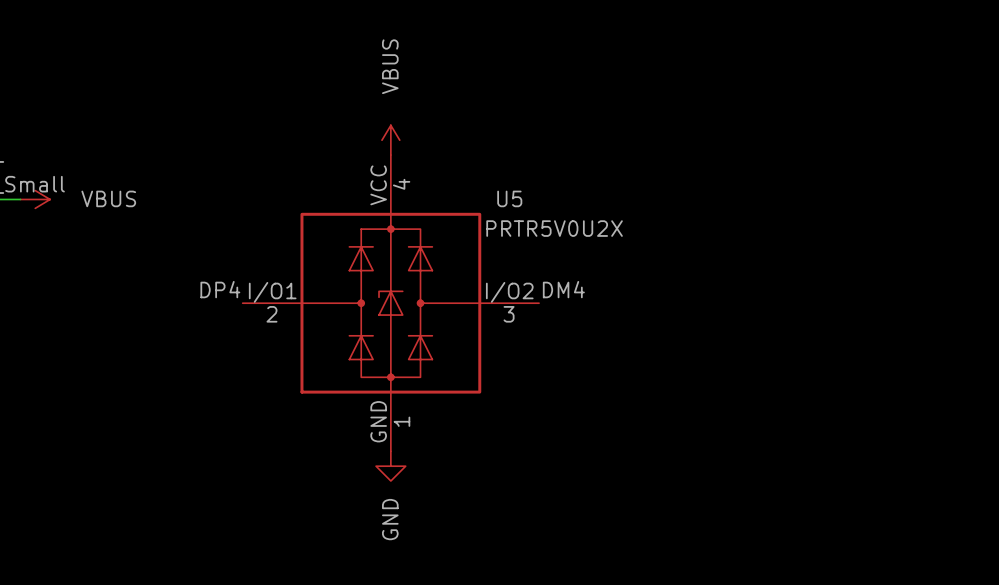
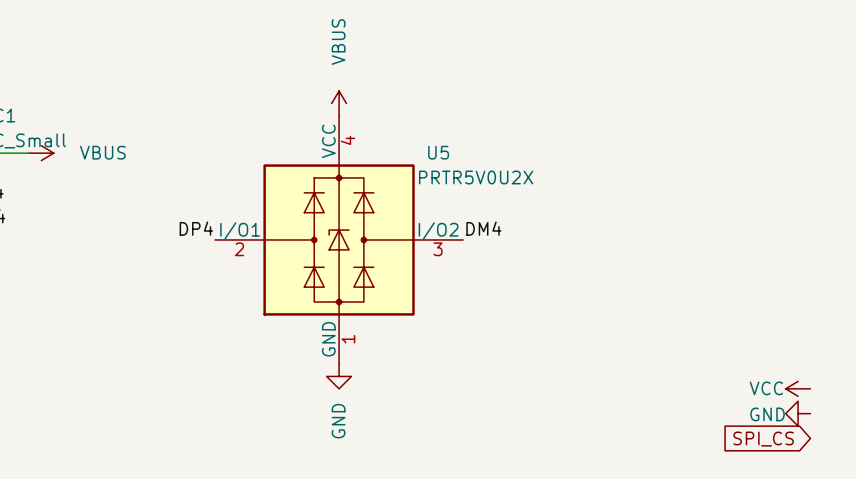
power symbol: none -> VCC (798, 388)
power symbol: none -> GND (798, 413)
global label: none -> SPI_CS (763, 439)

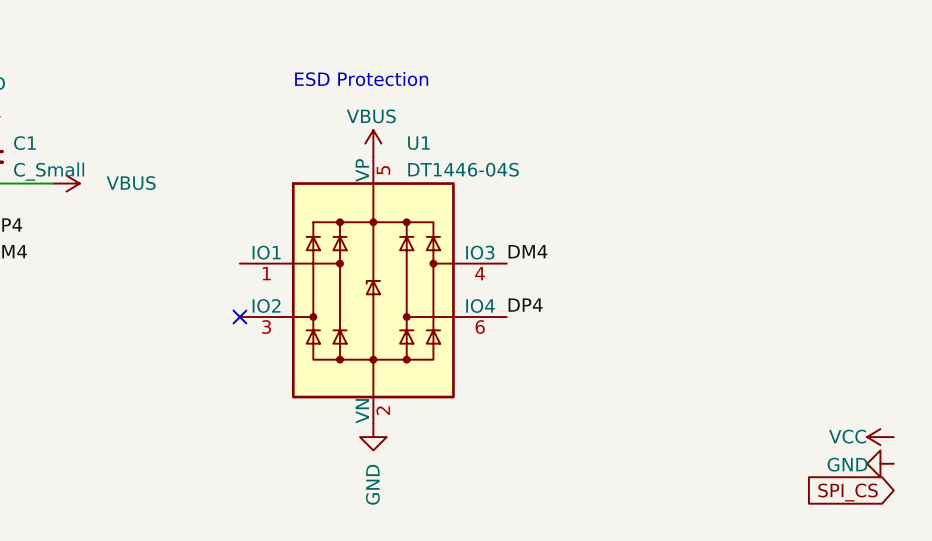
power symbol text rotation: 0° (338, 42) -> 90° clockwise (371, 116)
text: none -> ESD Protection (361, 79)
power symbol position: VBUS (339, 103) -> VBUS (373, 143)
label position: DP4 (196, 228) -> DP4 (525, 305)
label position: DM4 (483, 228) -> DM4 (527, 251)
U5: PRTR5V0U2X (339, 239) -> none
U1: none -> DT1446-04S (373, 290)
no-connect mark: none -> (239, 316)
power symbol position: GND (339, 376) -> GND (373, 437)

